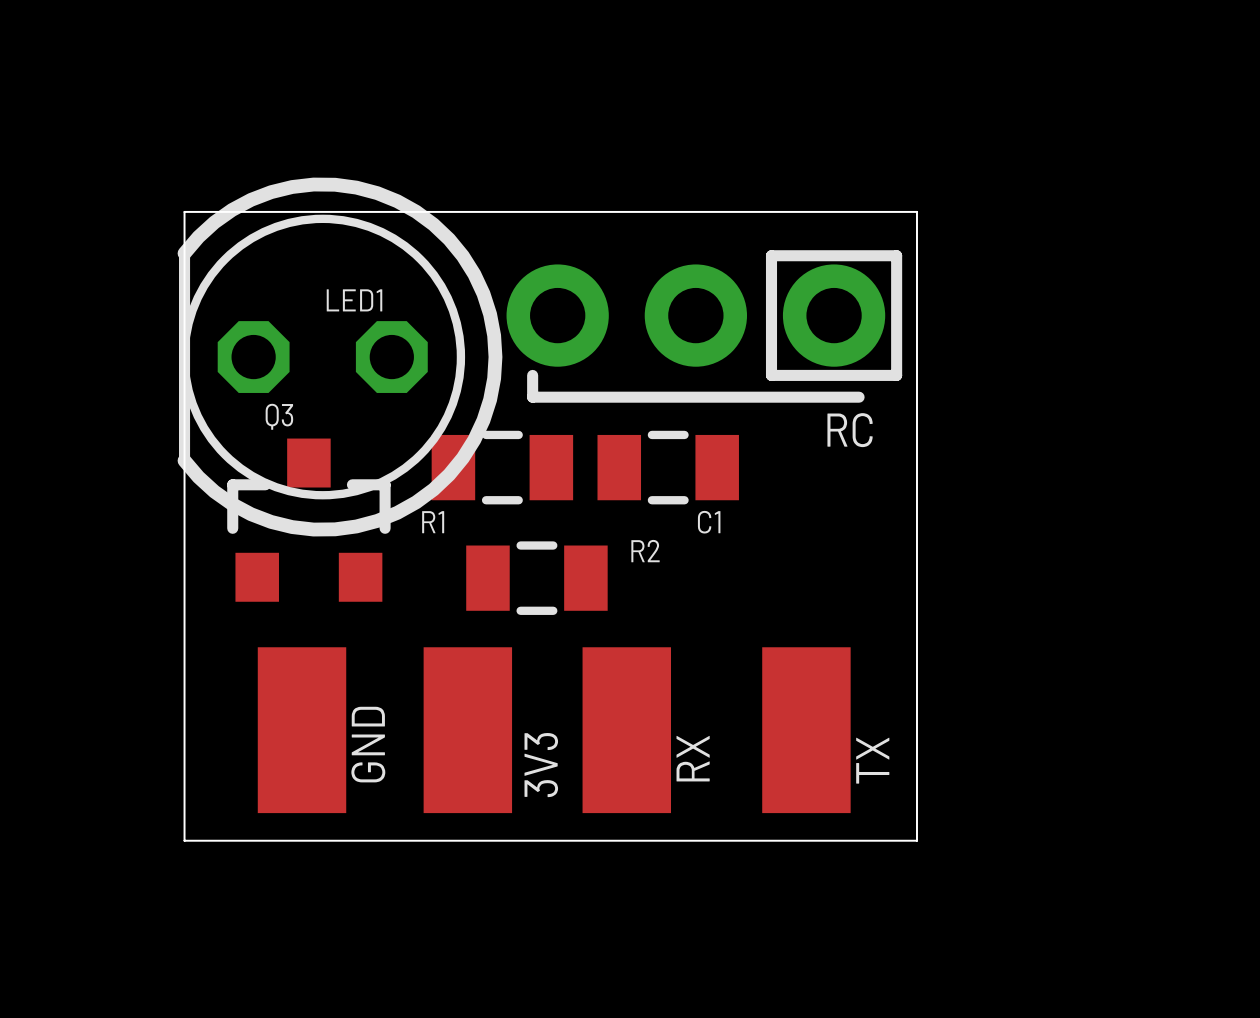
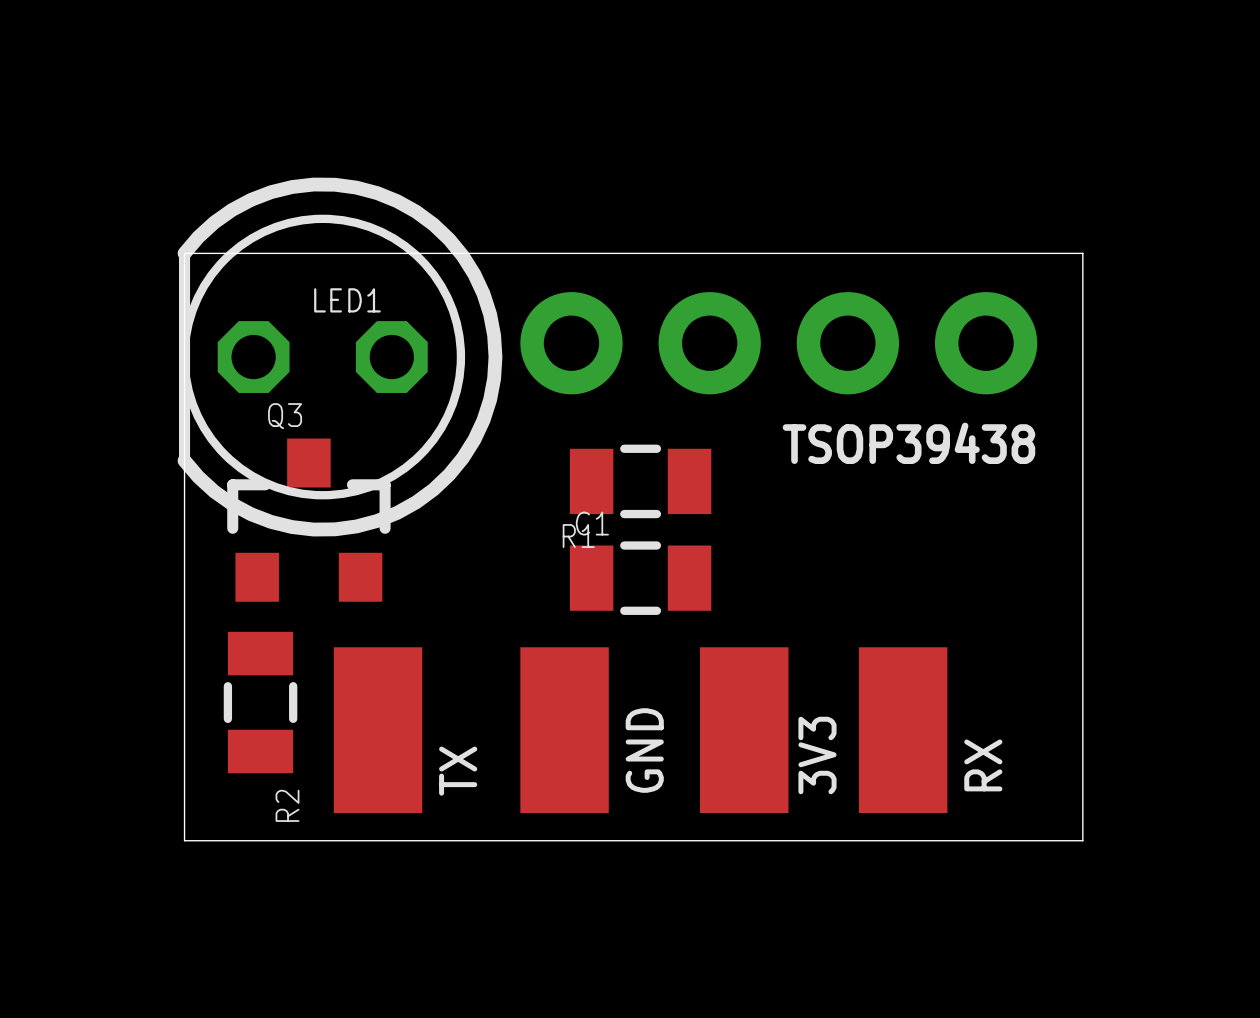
board edge: (184, 253) (184, 211) (916, 211) (916, 840) -> (184, 253) (1082, 253) (1082, 840) (916, 840)
RC: (704, 326) -> none
TSOP39438: none -> (778, 343)
R1 position: (502, 467) -> (640, 481)
C1 position: (668, 467) -> (640, 578)
C1 name position: C1 (709, 522) -> C1 (592, 523)
R2 rotation: 0° (536, 578) -> 90° clockwise (260, 702)
R2 position: (536, 578) -> (260, 702)
part: (302, 730) -> none
part: none -> (378, 730)
part: (467, 730) -> none
part: none -> (564, 730)
part: (626, 730) -> none
part: none -> (744, 730)
part: (806, 730) -> none
part: none -> (903, 730)
text position: GND (368, 744) -> GND (644, 750)
text position: RX (693, 758) -> RX (983, 765)
text position: TX (872, 760) -> TX (458, 771)
text position: 3V3 (541, 765) -> 3V3 (817, 755)

